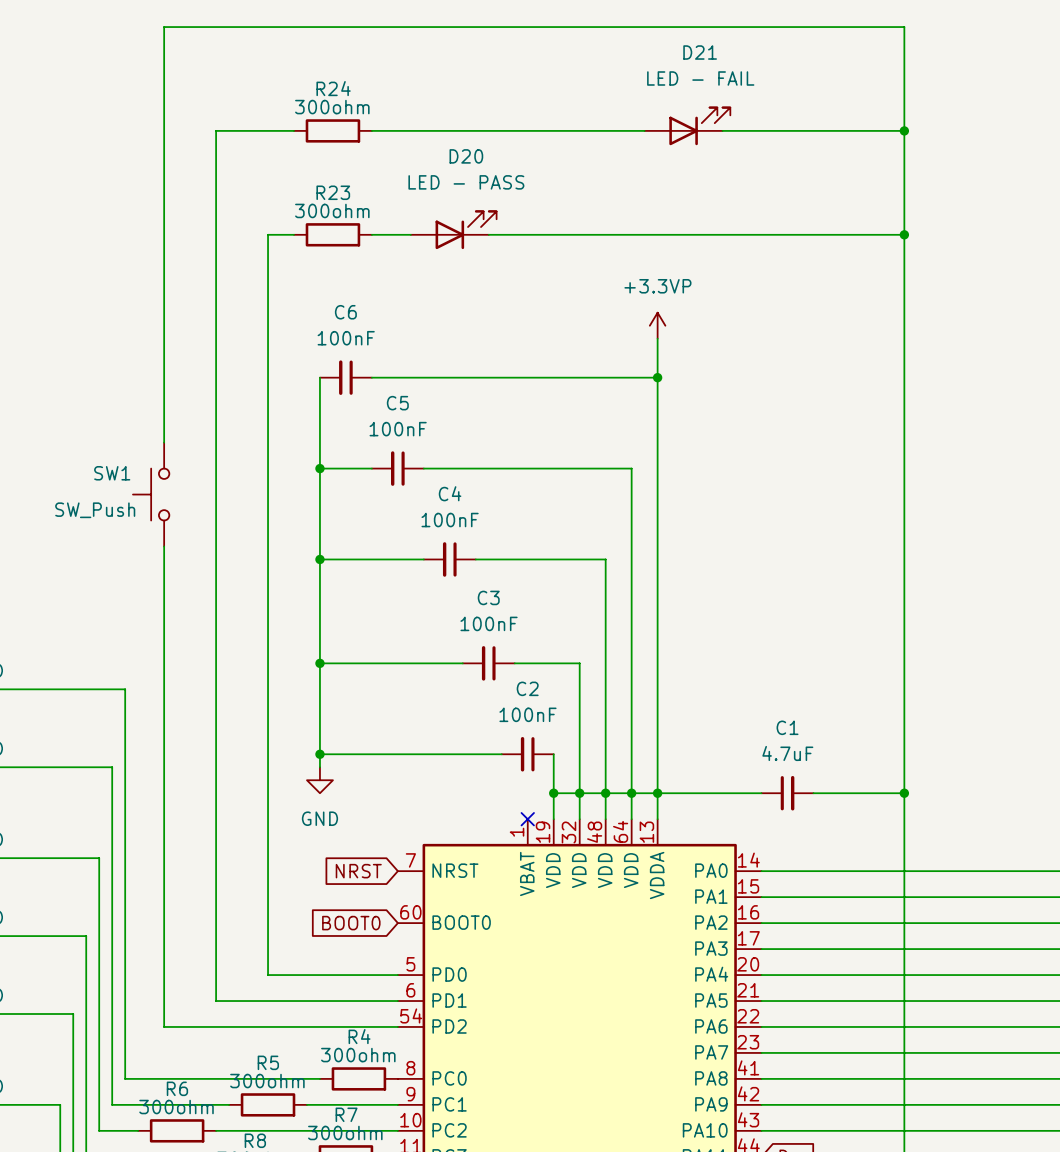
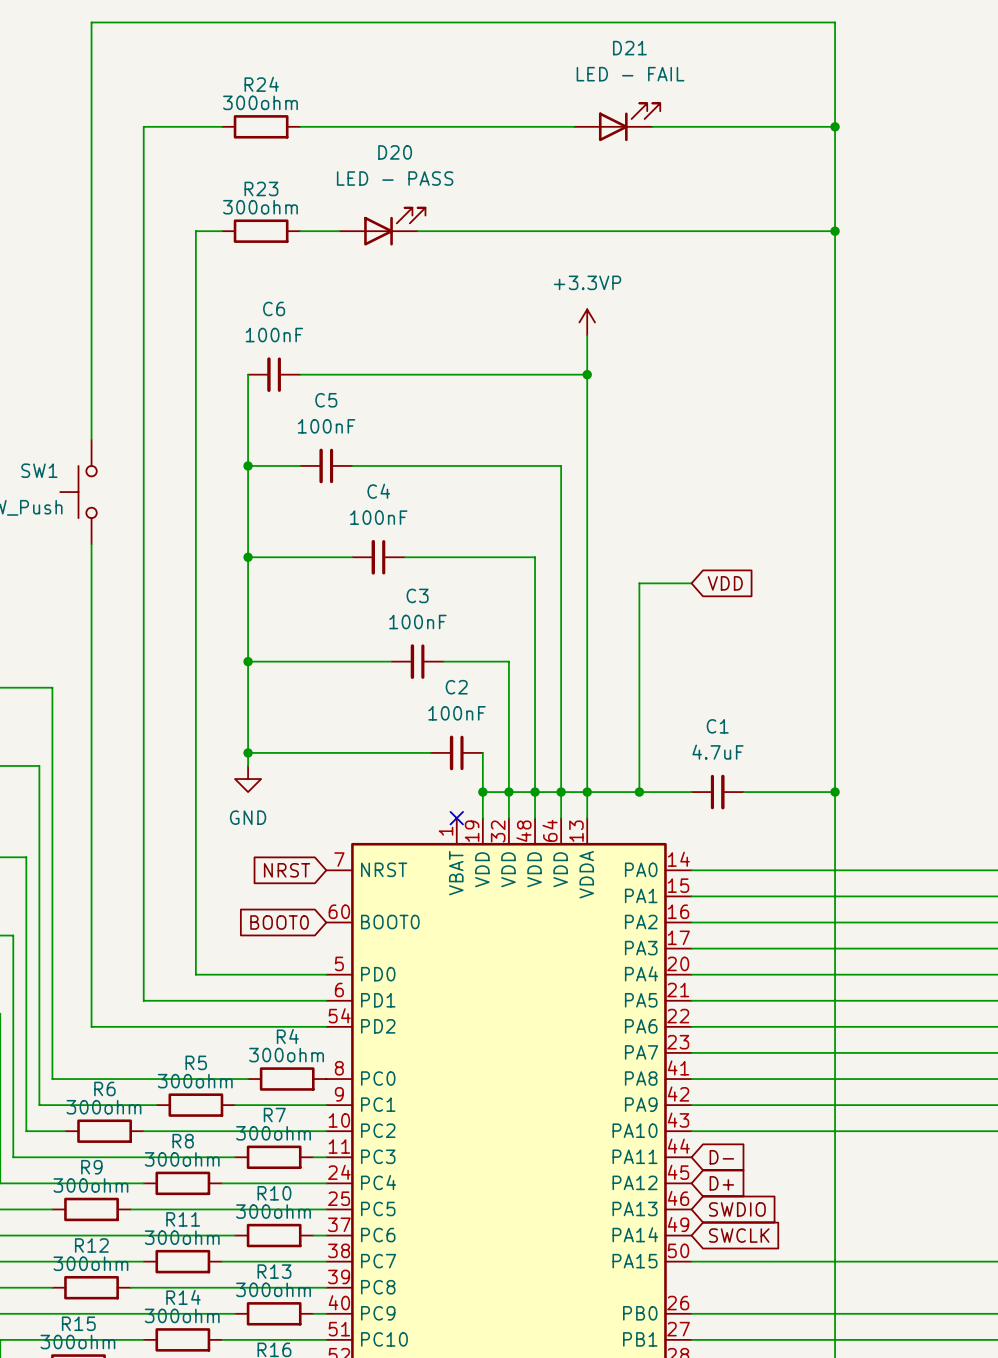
wire: none -> (691, 583) (639, 583) (639, 792)
global label: none -> VDD (725, 583)
junction: none -> (639, 792)

